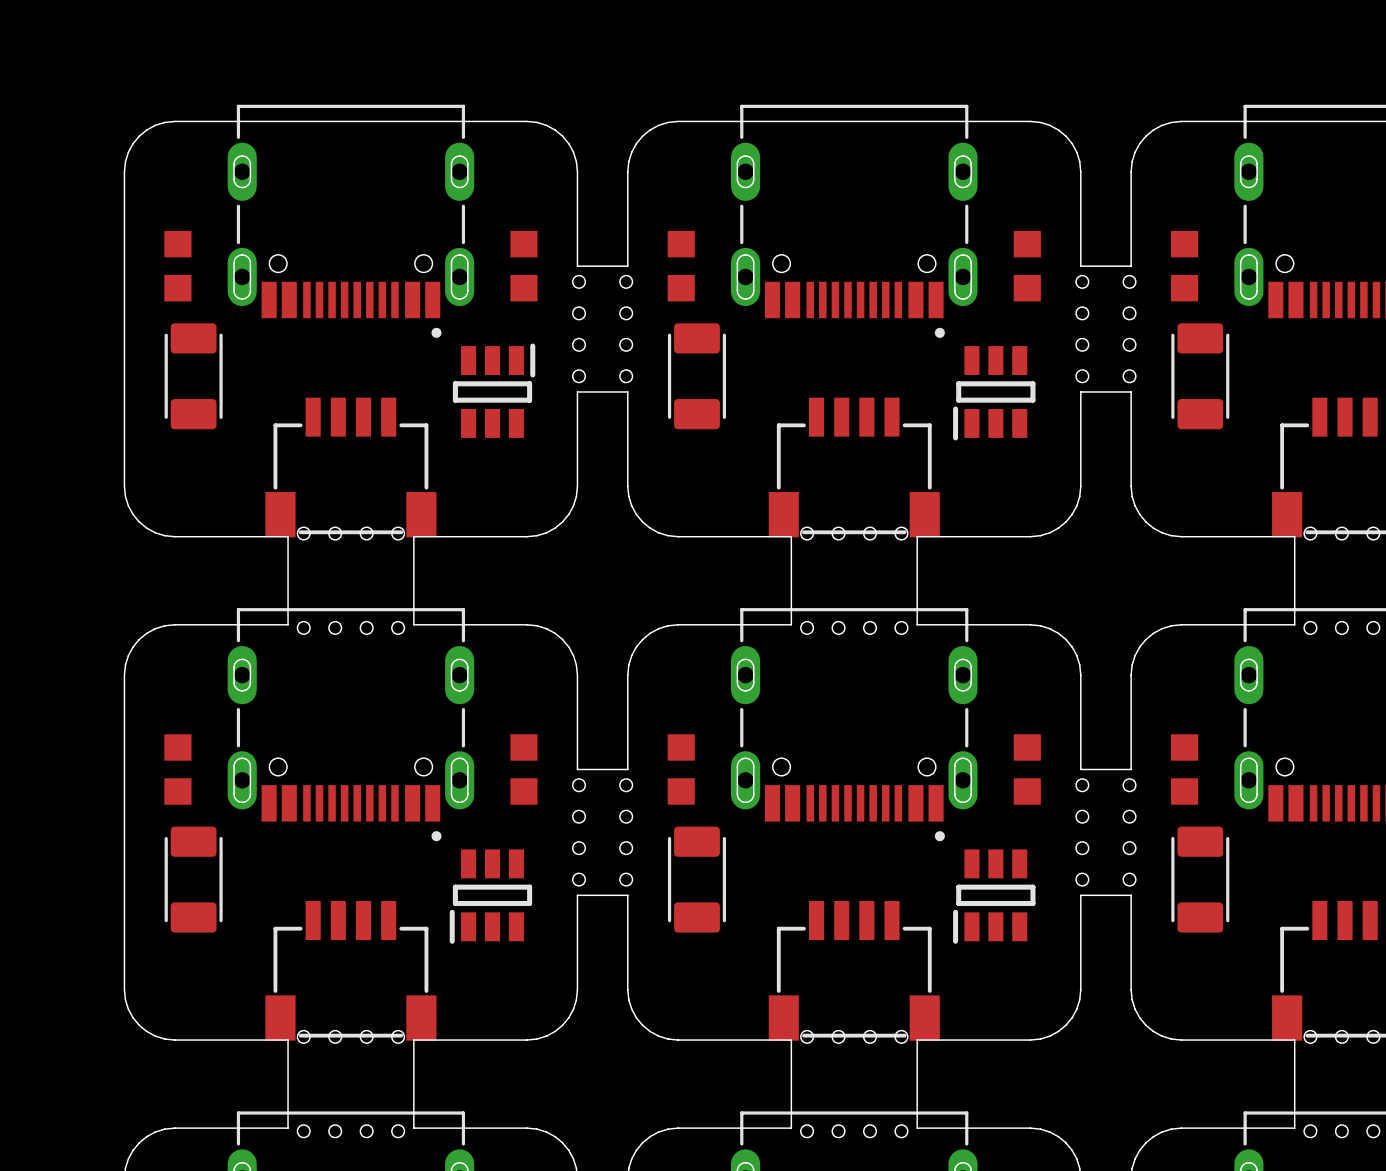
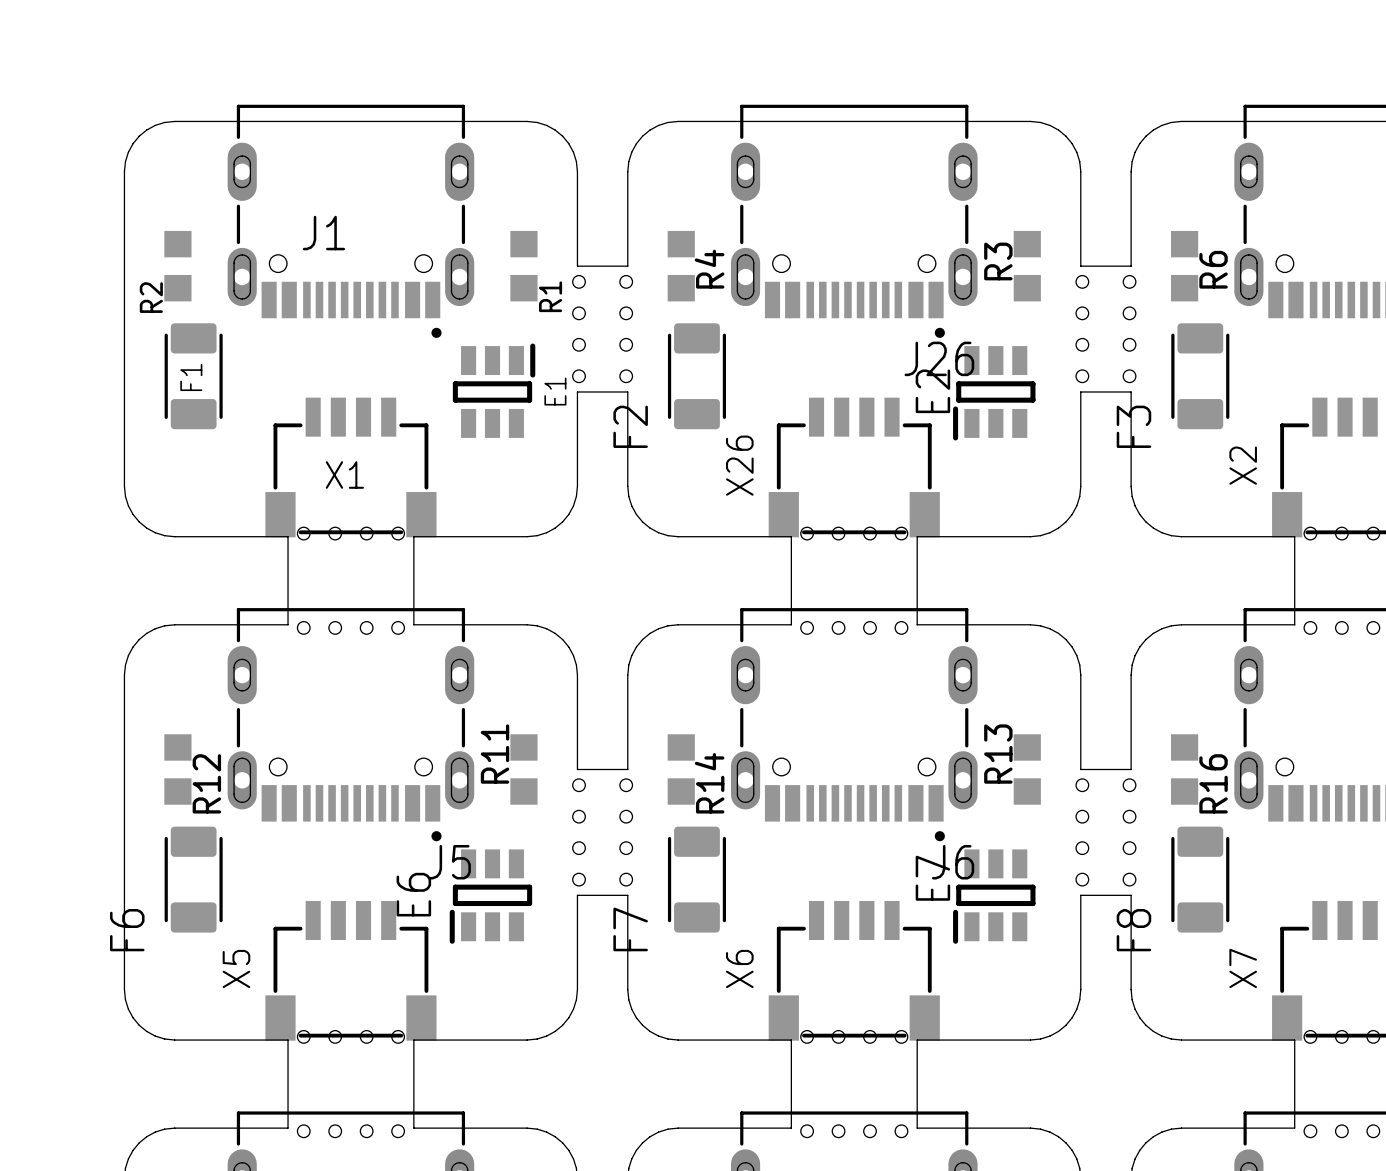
J1 name: none -> J1 (323, 233)
R4 name: none -> R4 (709, 269)
R6 name: none -> R6 (1213, 269)
R3 name: none -> R3 (998, 261)
R1 name: none -> R1 (550, 296)
R2 name: none -> R2 (151, 297)
J26 name: none -> J26 (939, 358)
F1 name: none -> F1 (191, 377)
E1 name: none -> E1 (555, 391)
E2 name: none -> E2 (932, 391)
F2 name: none -> F2 (630, 426)
F3 name: none -> F3 (1133, 426)
X26 name: none -> X26 (739, 465)
X2 name: none -> X2 (1243, 465)
X1 name: none -> X1 (344, 474)
R11 name: none -> R11 (495, 754)
R13 name: none -> R13 (998, 754)
R14 name: none -> R14 (709, 783)
R16 name: none -> R16 (1213, 783)
R12 name: none -> R12 (206, 783)
J5 name: none -> J5 (449, 862)
J6 name: none -> J6 (953, 862)
E7 name: none -> E7 (932, 878)
E6 name: none -> E6 (413, 894)
F6 name: none -> F6 (127, 930)
F8 name: none -> F8 (1133, 930)
F7 name: none -> F7 (630, 929)
X5 name: none -> X5 (236, 968)
X6 name: none -> X6 (739, 968)
X7 name: none -> X7 (1243, 968)

